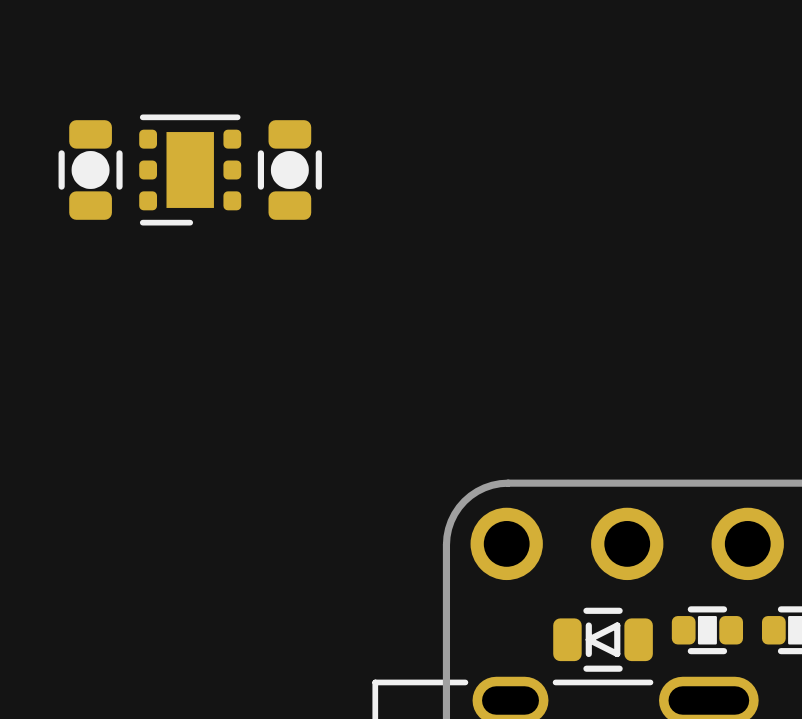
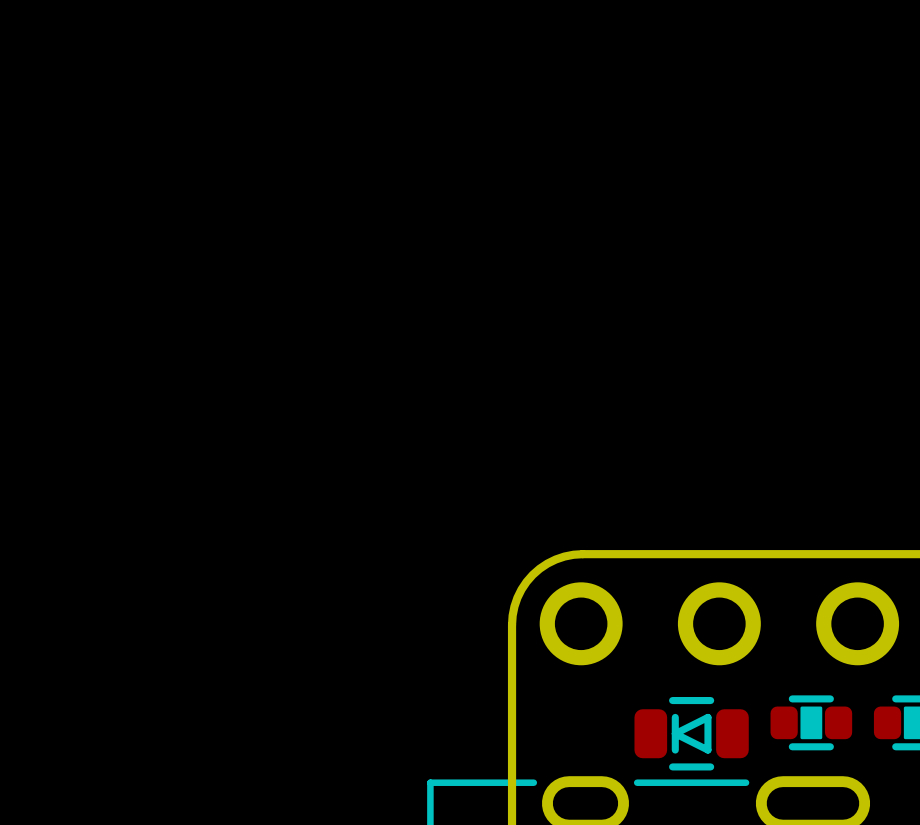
part: (90, 169) -> none
part: (190, 169) -> none
part: (289, 169) -> none

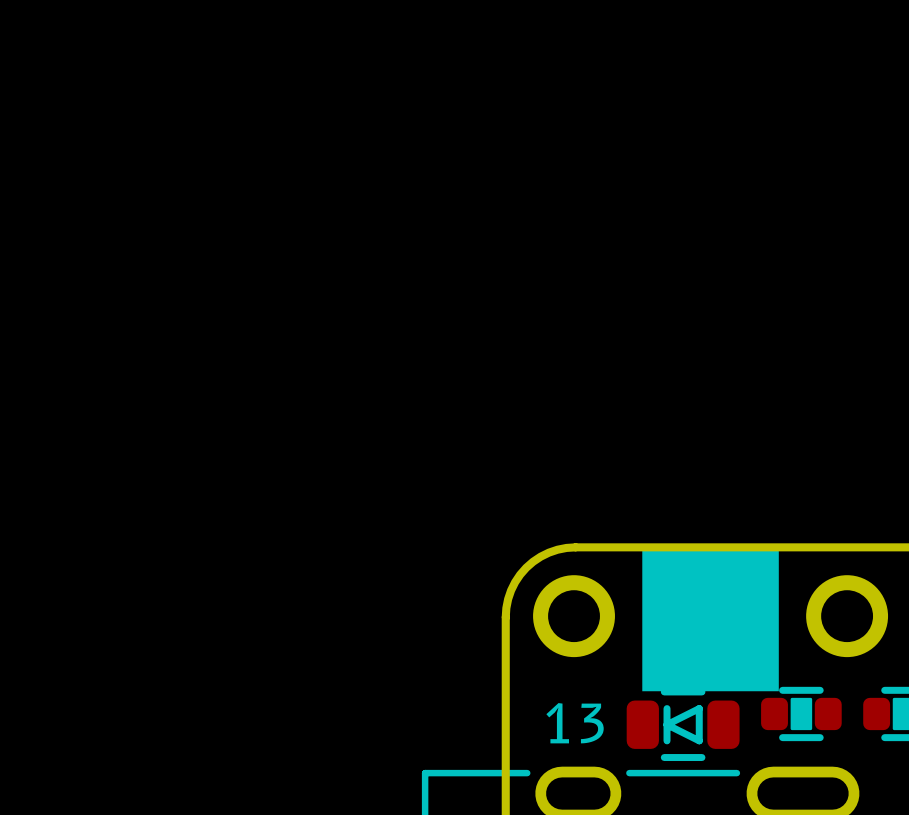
drawing: none -> [642, 547, 779, 692]
text: none -> 13 (575, 723)

